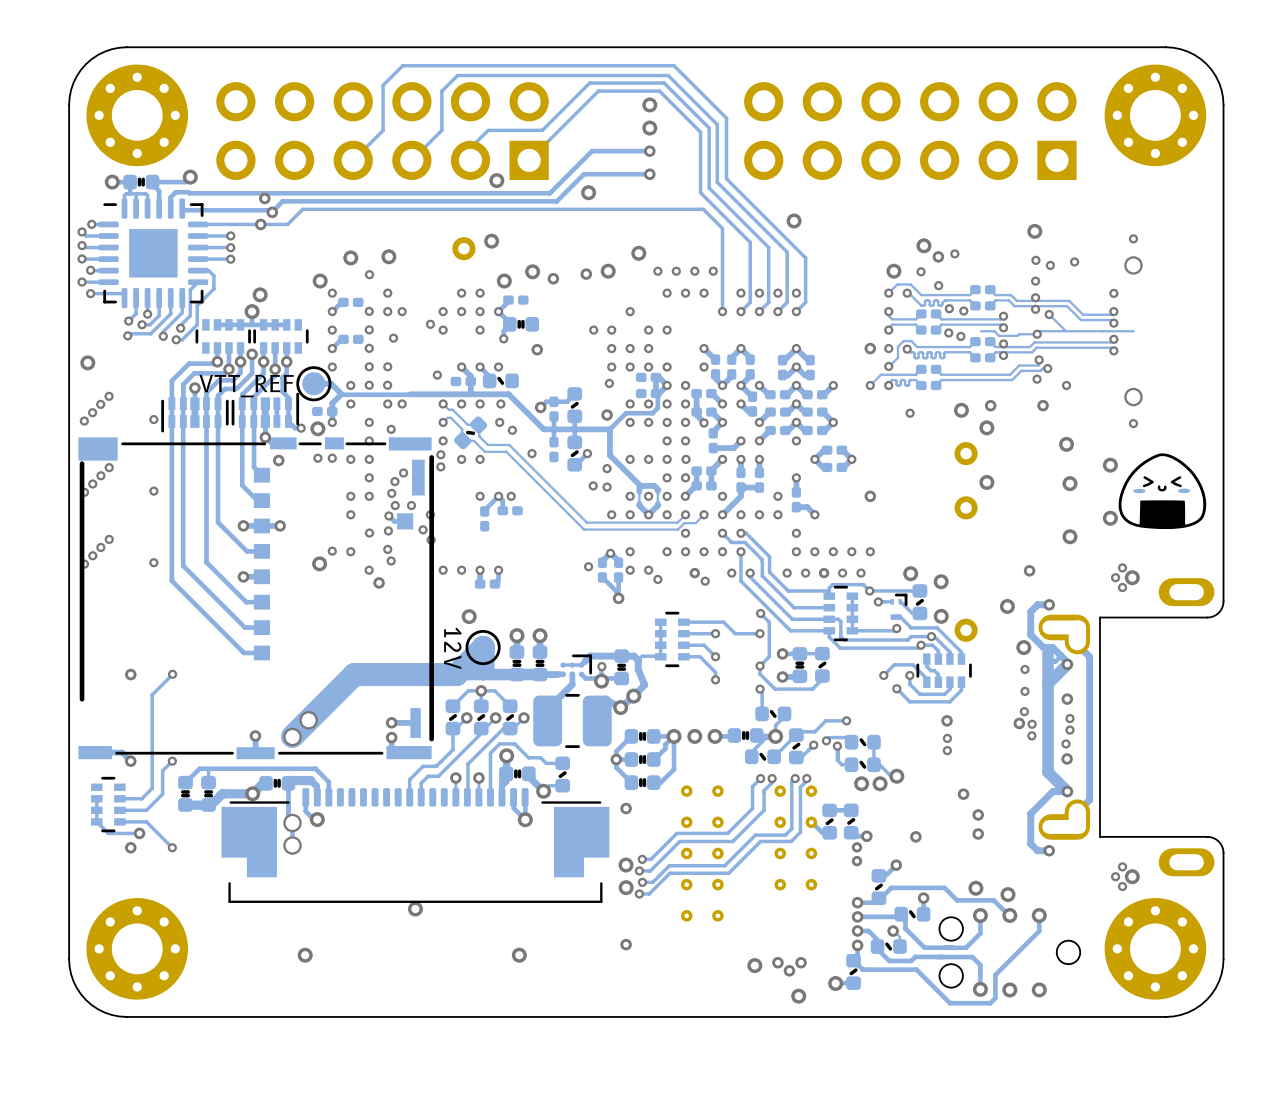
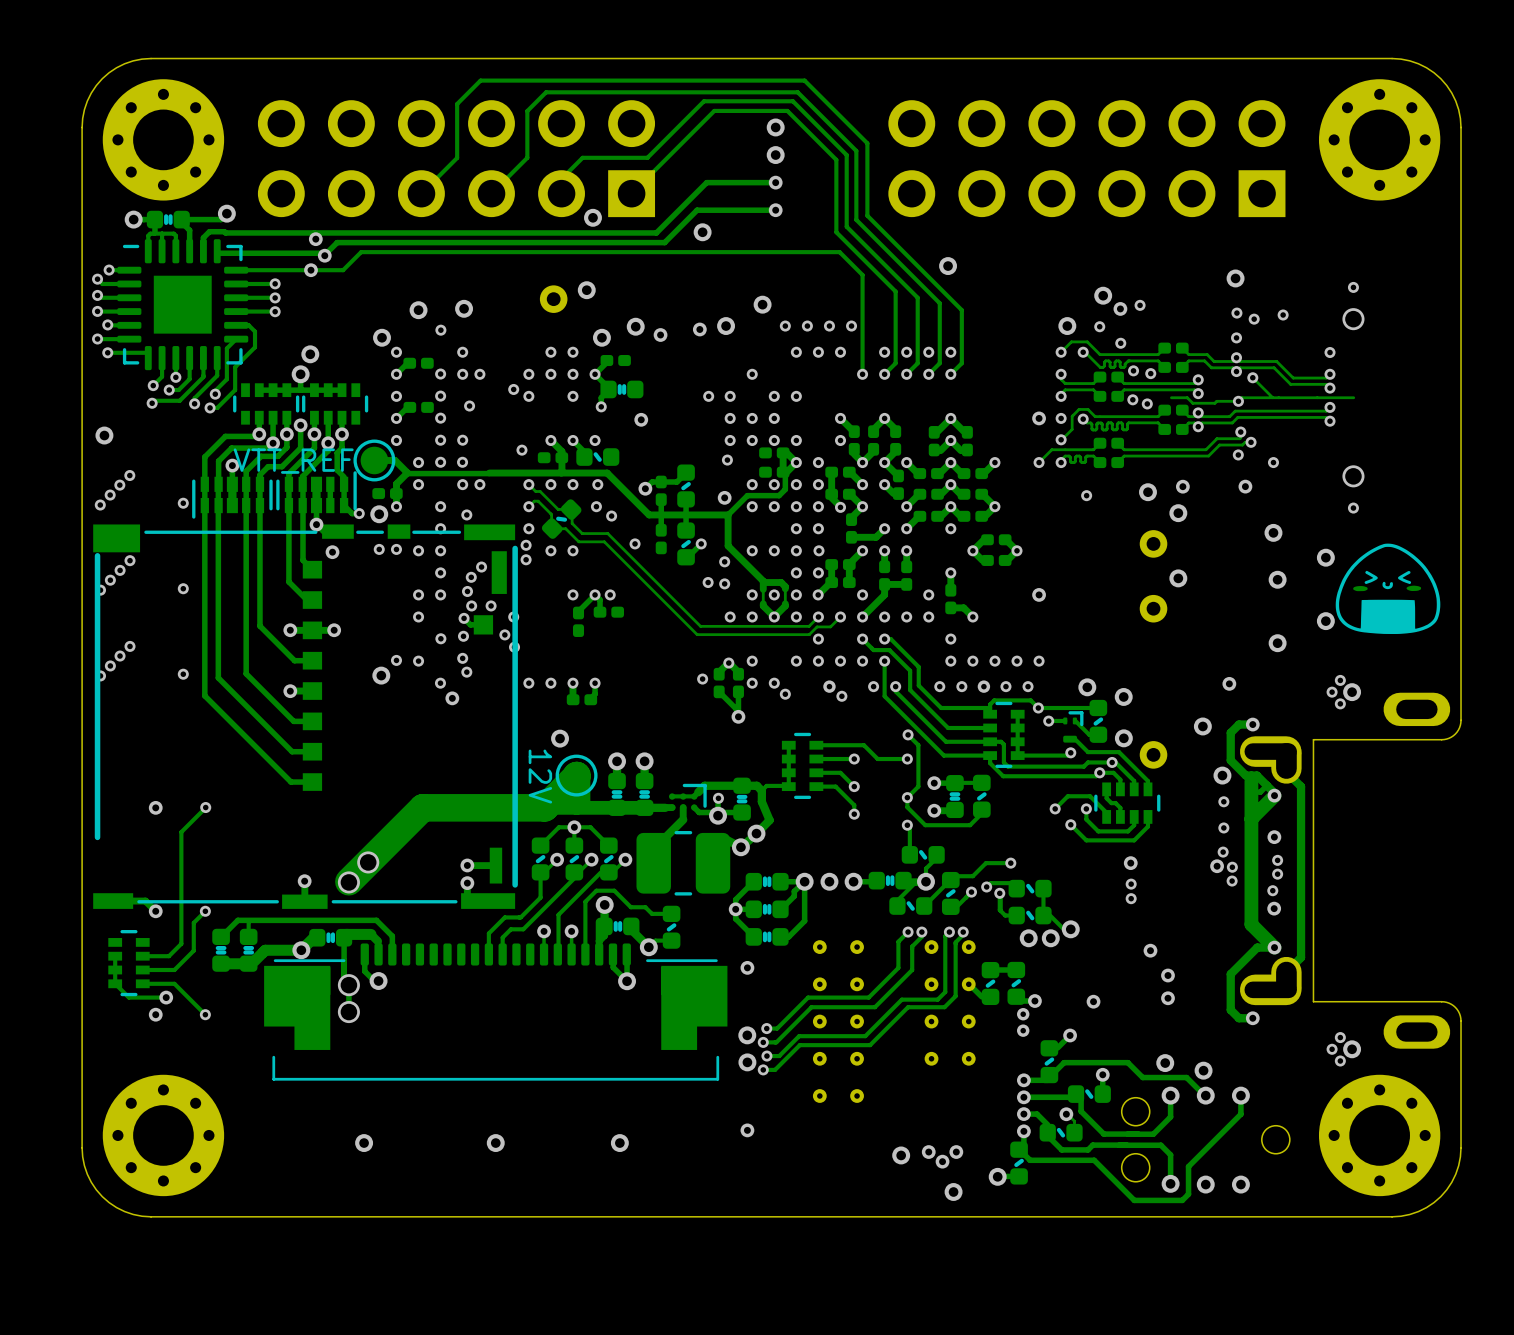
via position: (415, 909) -> (495, 1143)

